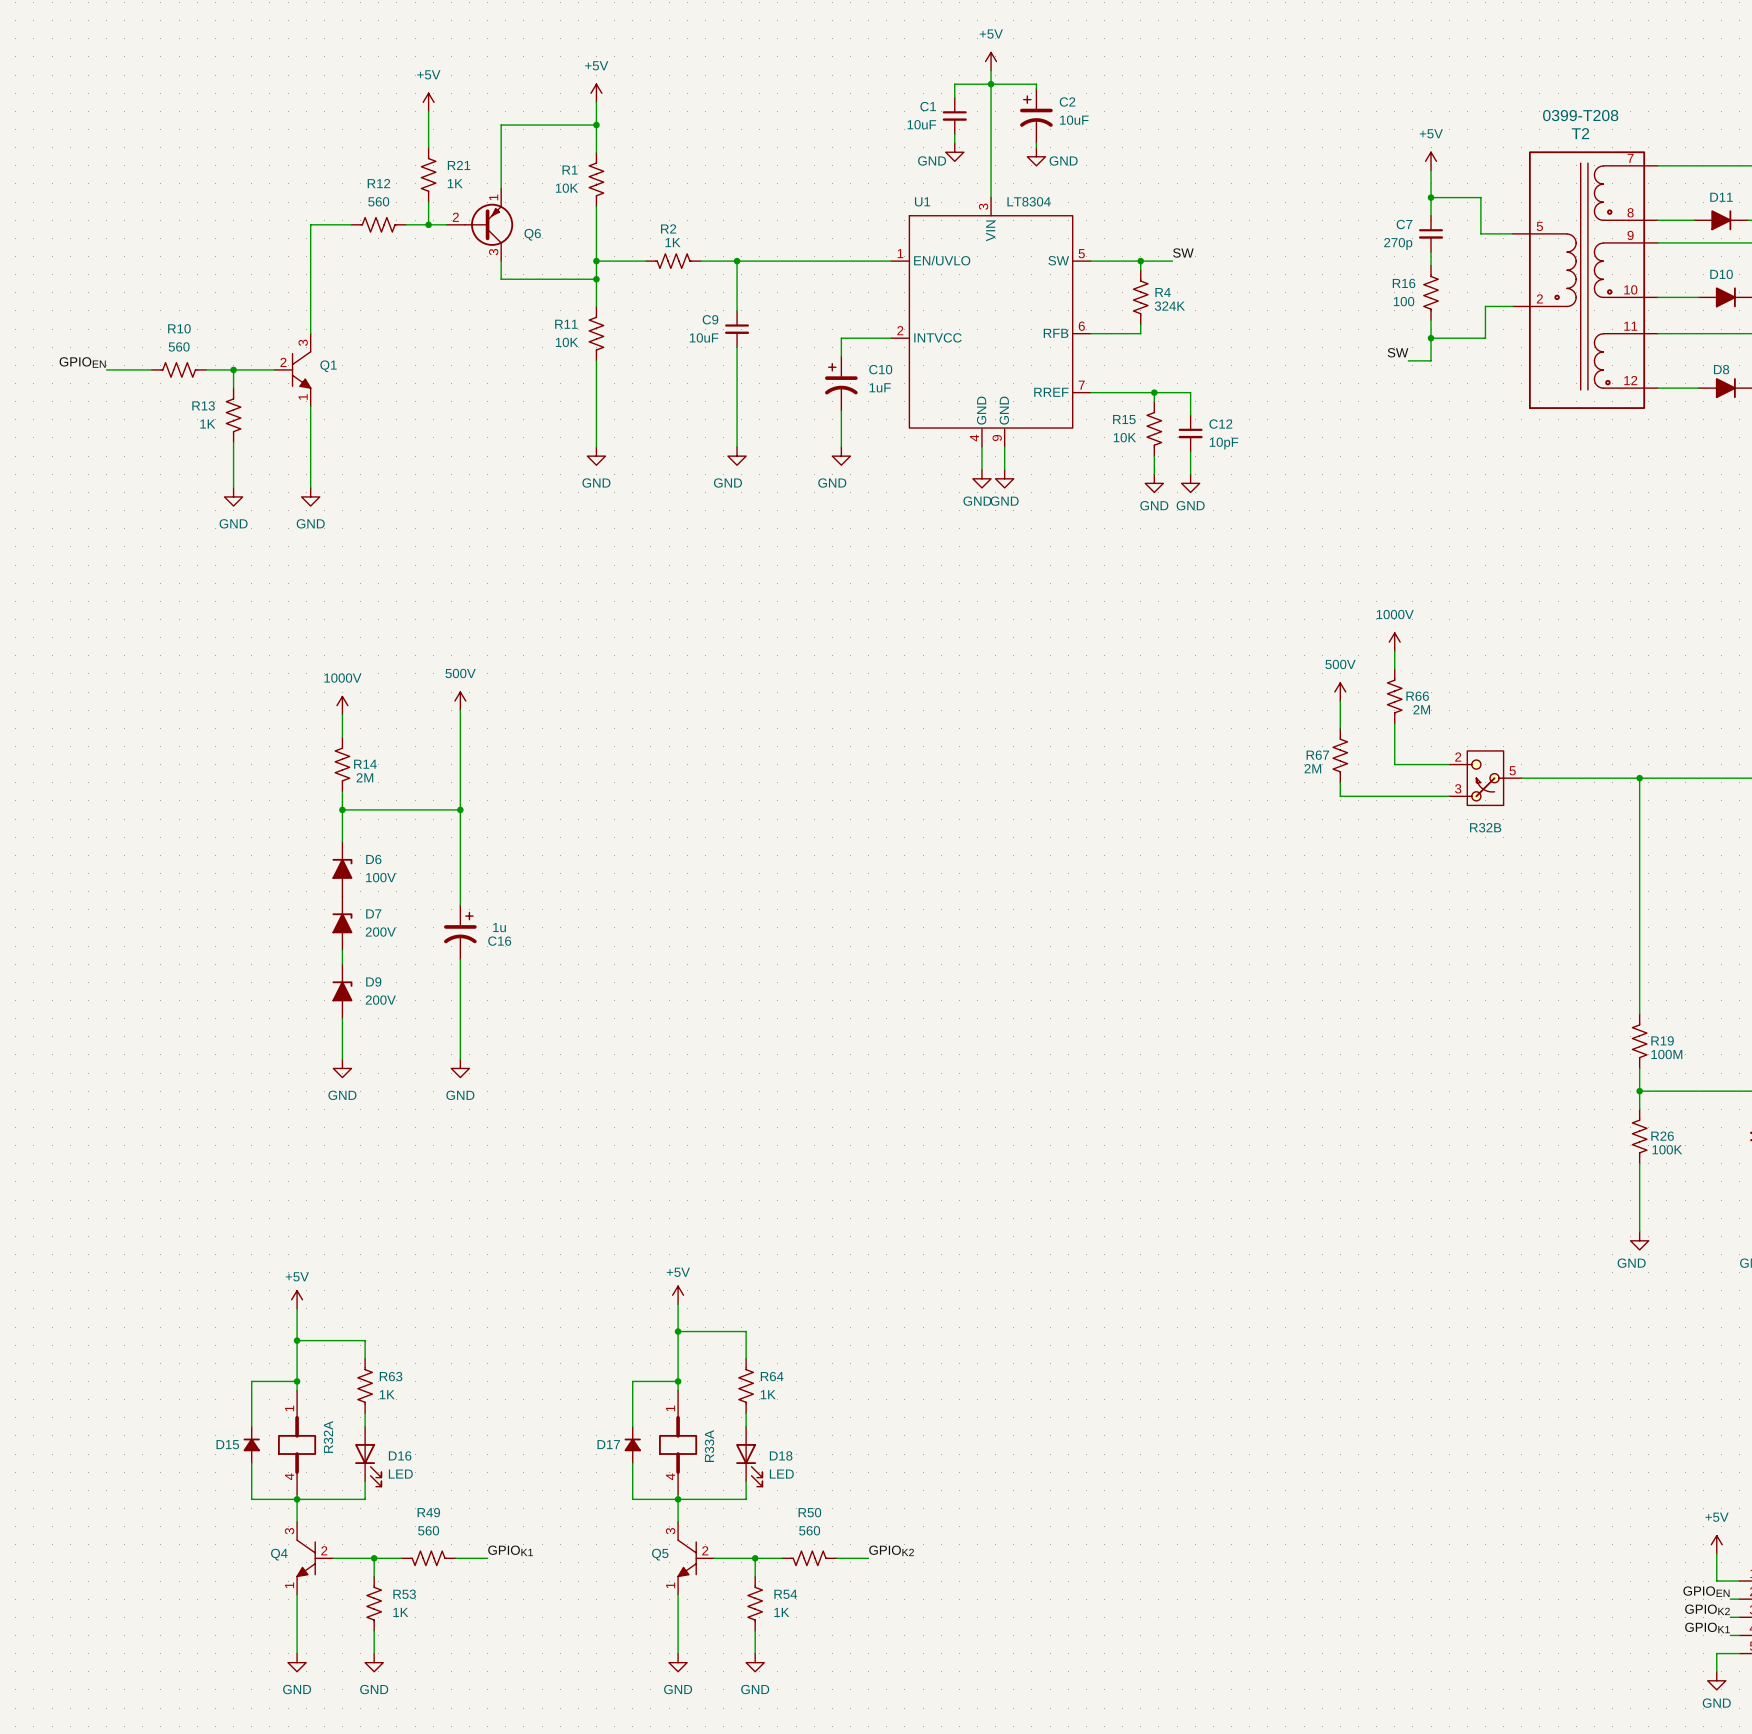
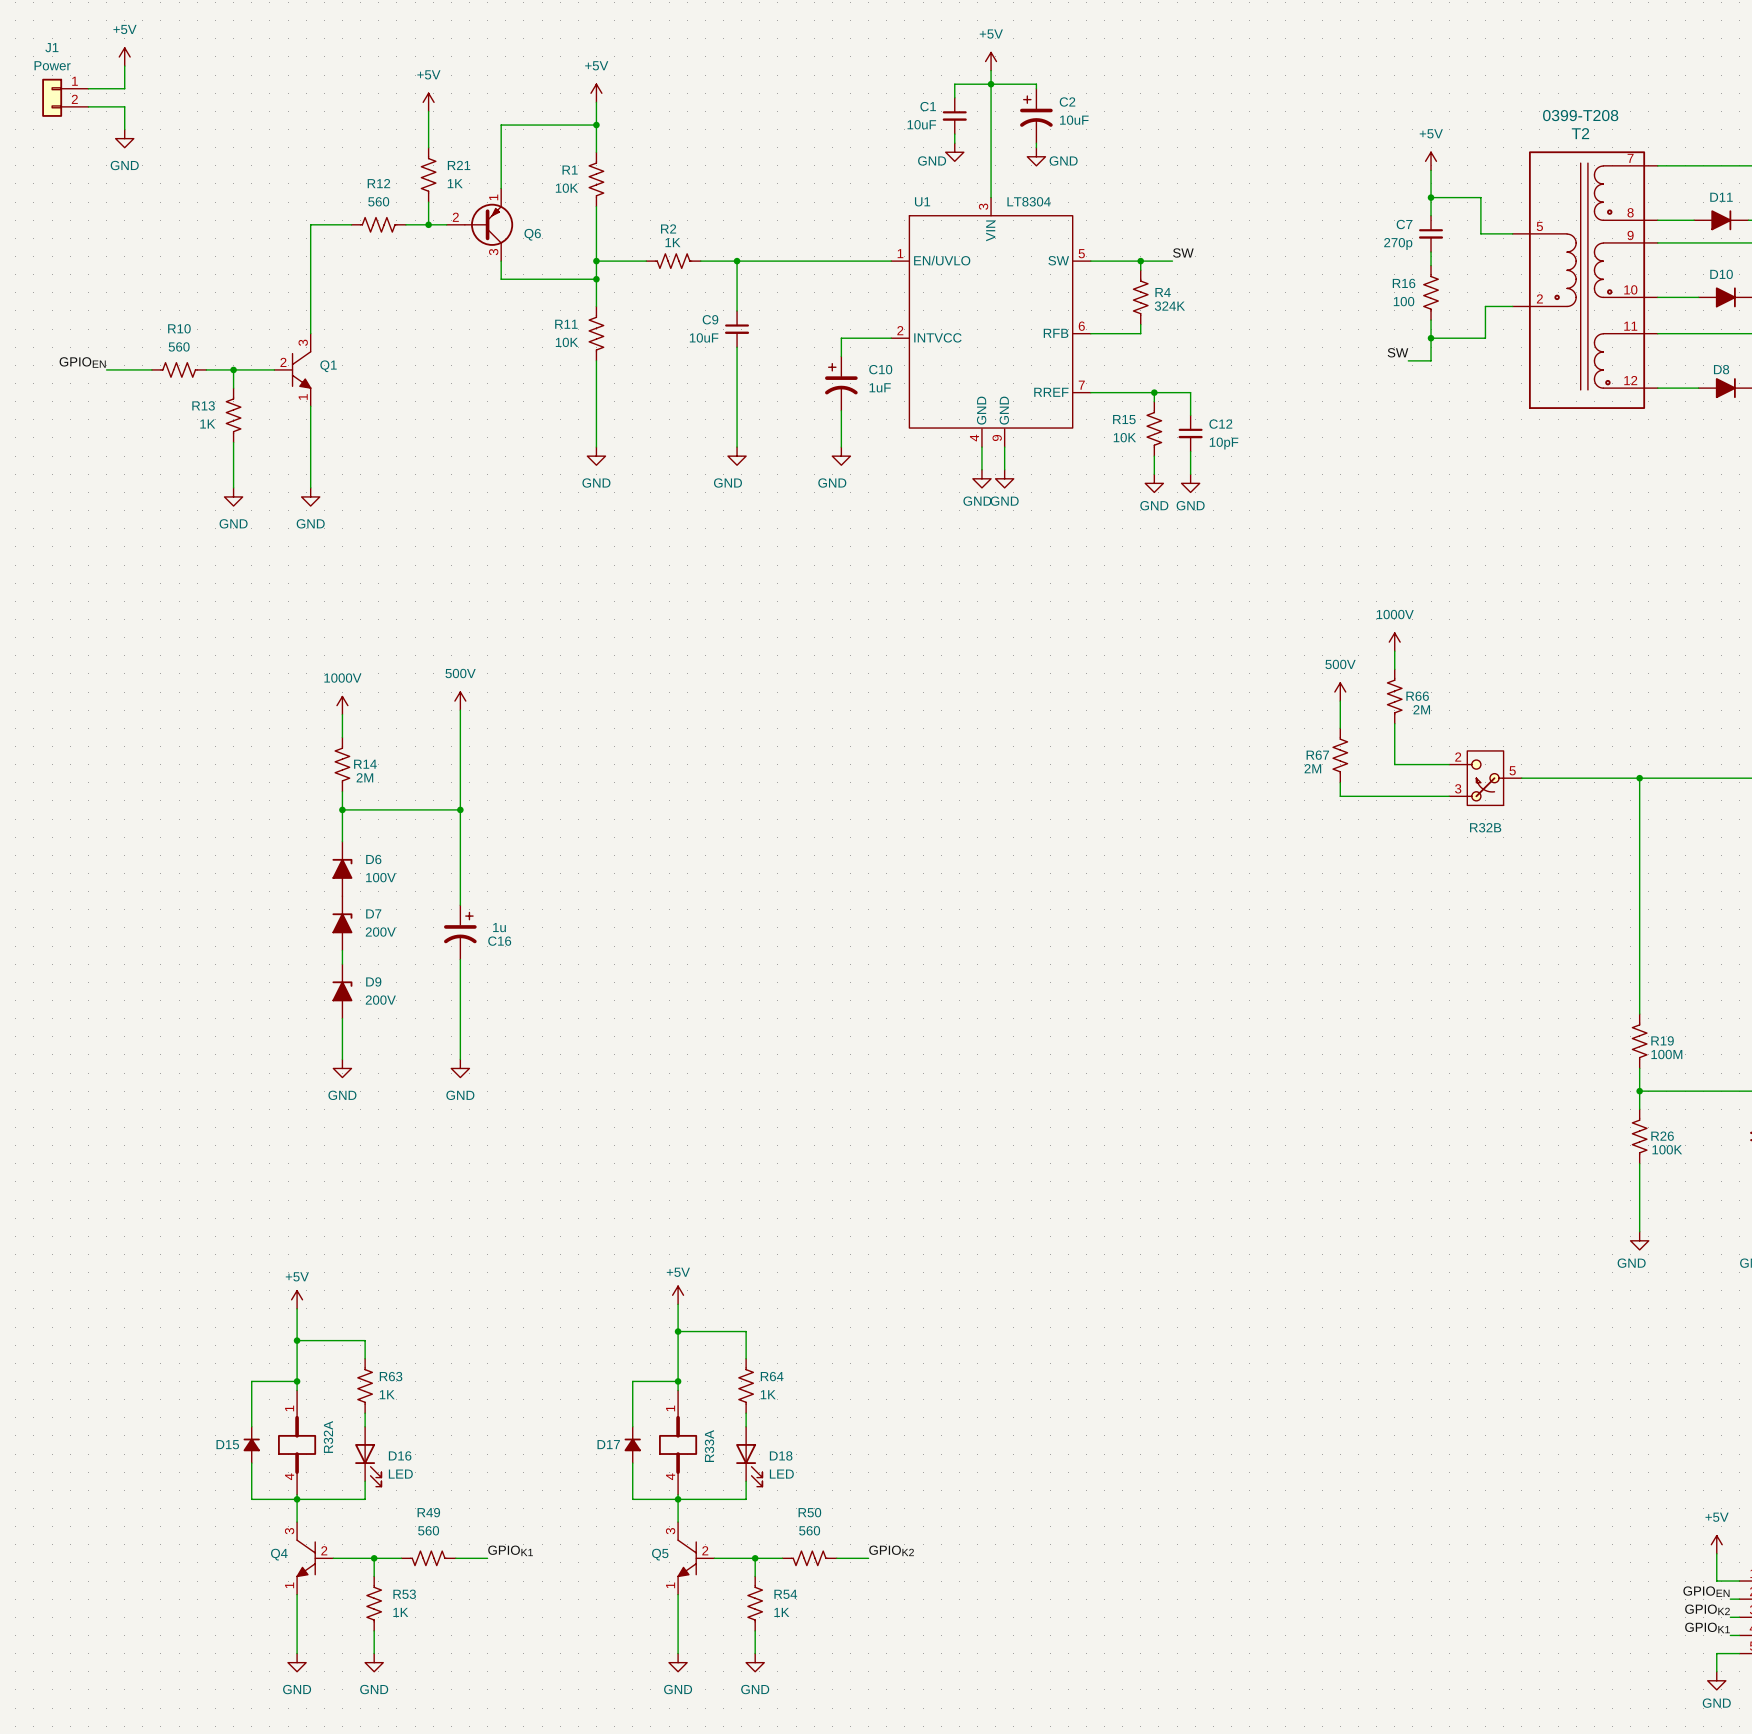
power symbol: none -> +5V (124, 56)
wire: none -> (124, 66) (124, 88) (88, 88)
J1: none -> Power (65, 97)
wire: none -> (88, 106) (124, 106) (124, 129)
power symbol: none -> GND (124, 138)

